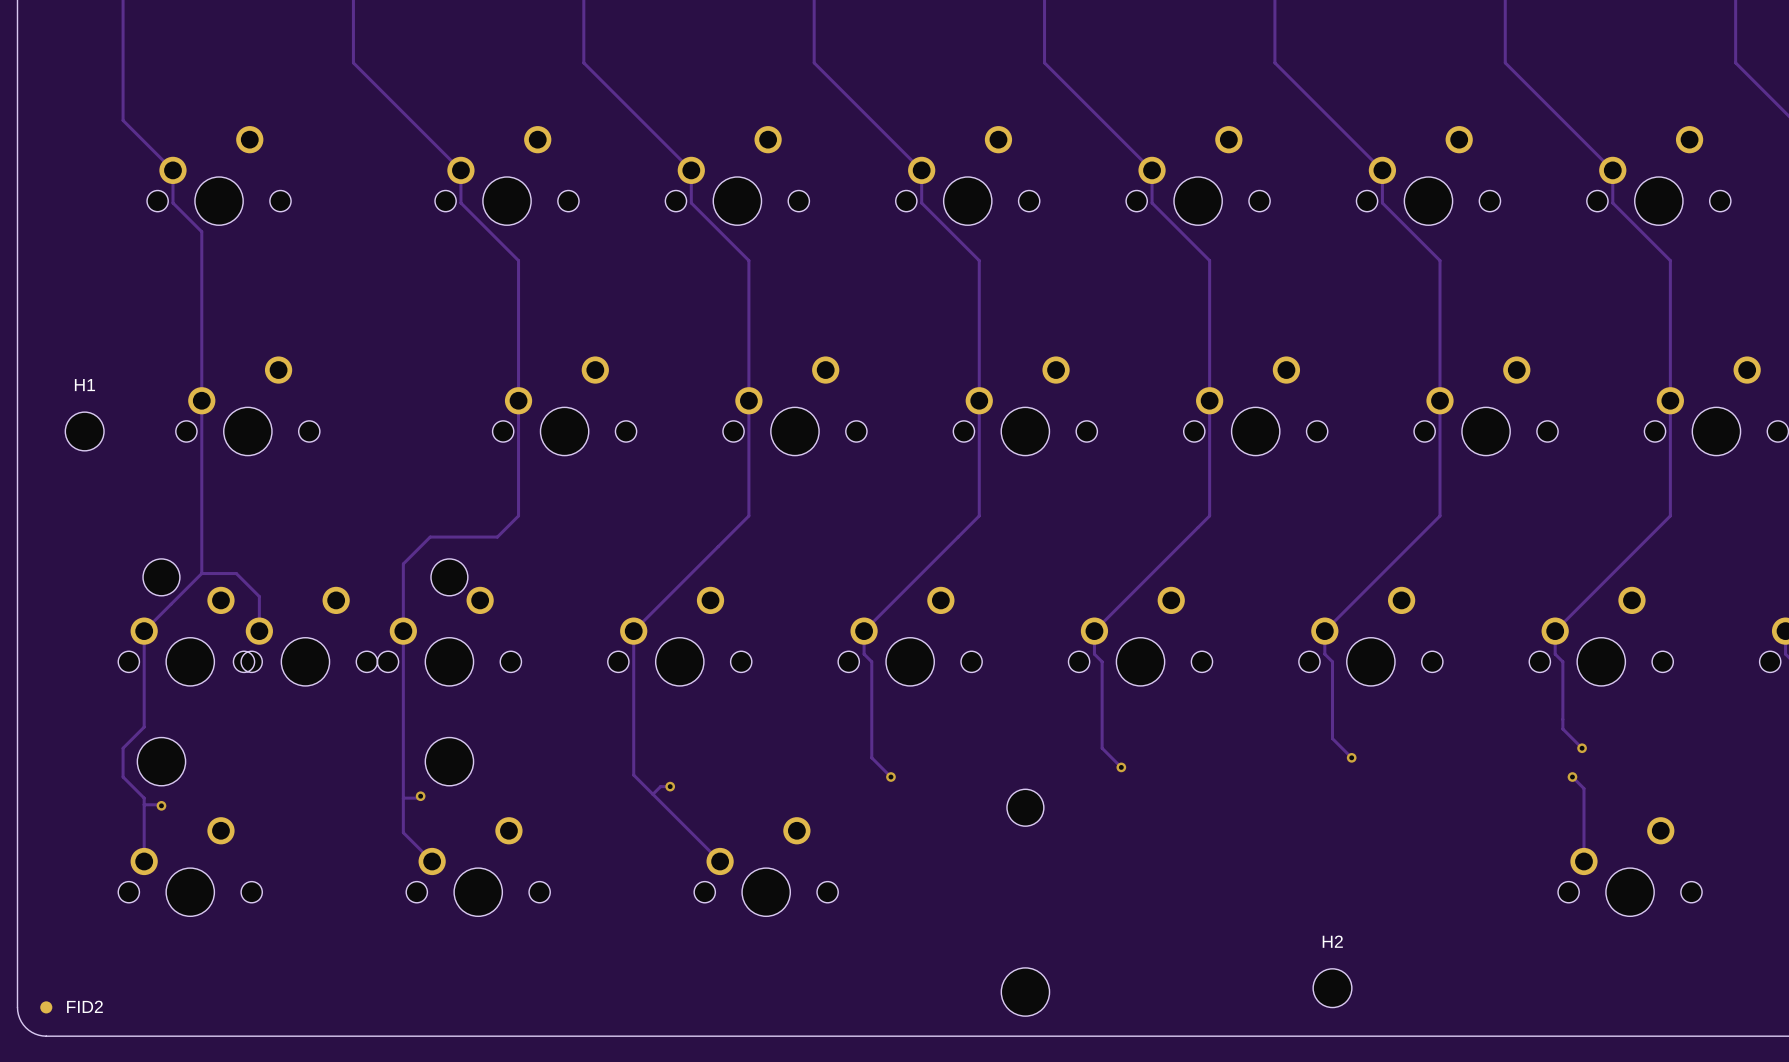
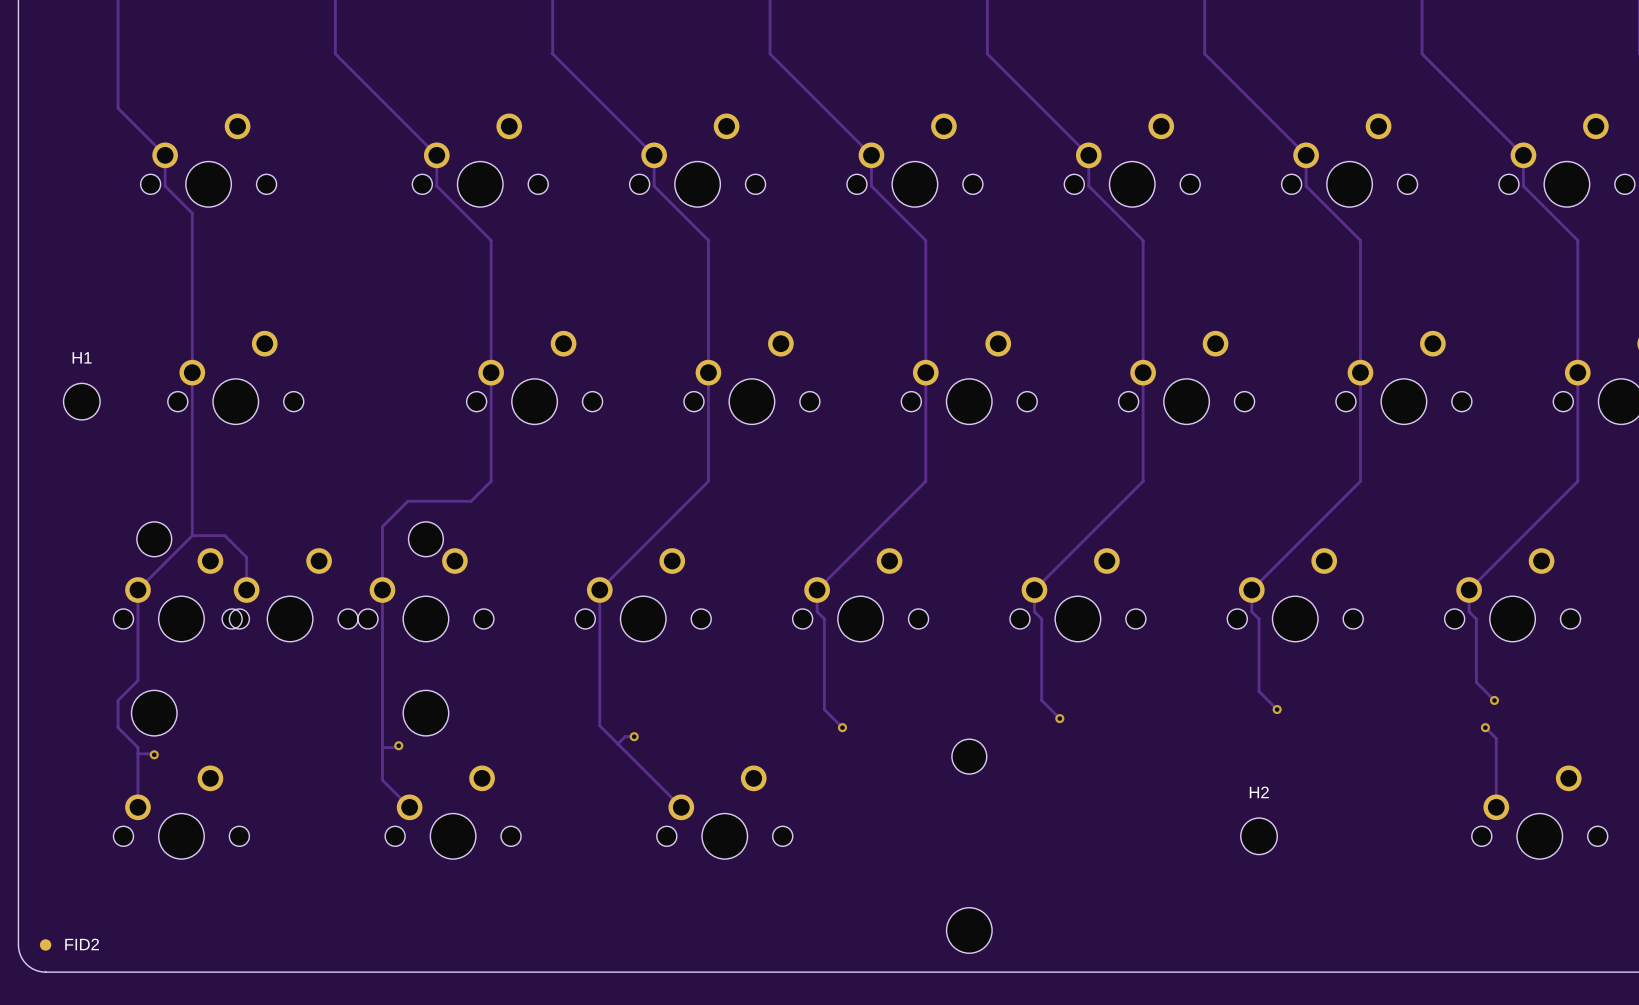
H2 position: (1332, 988) -> (1259, 836)

